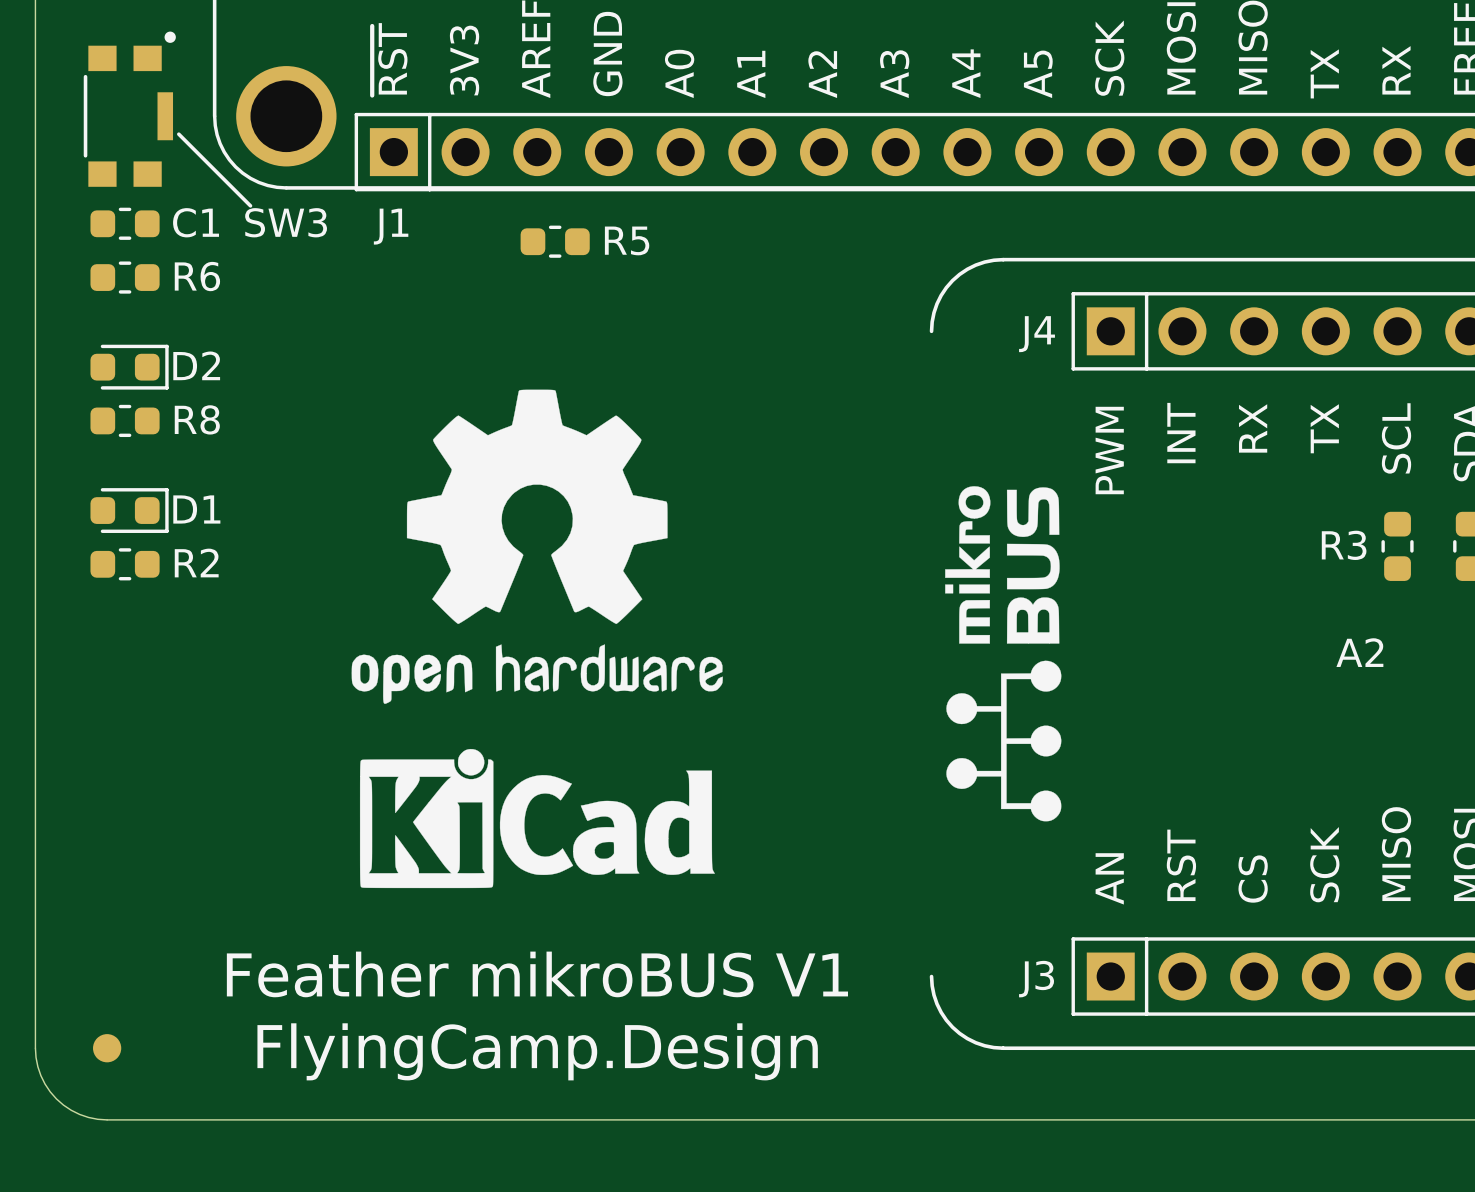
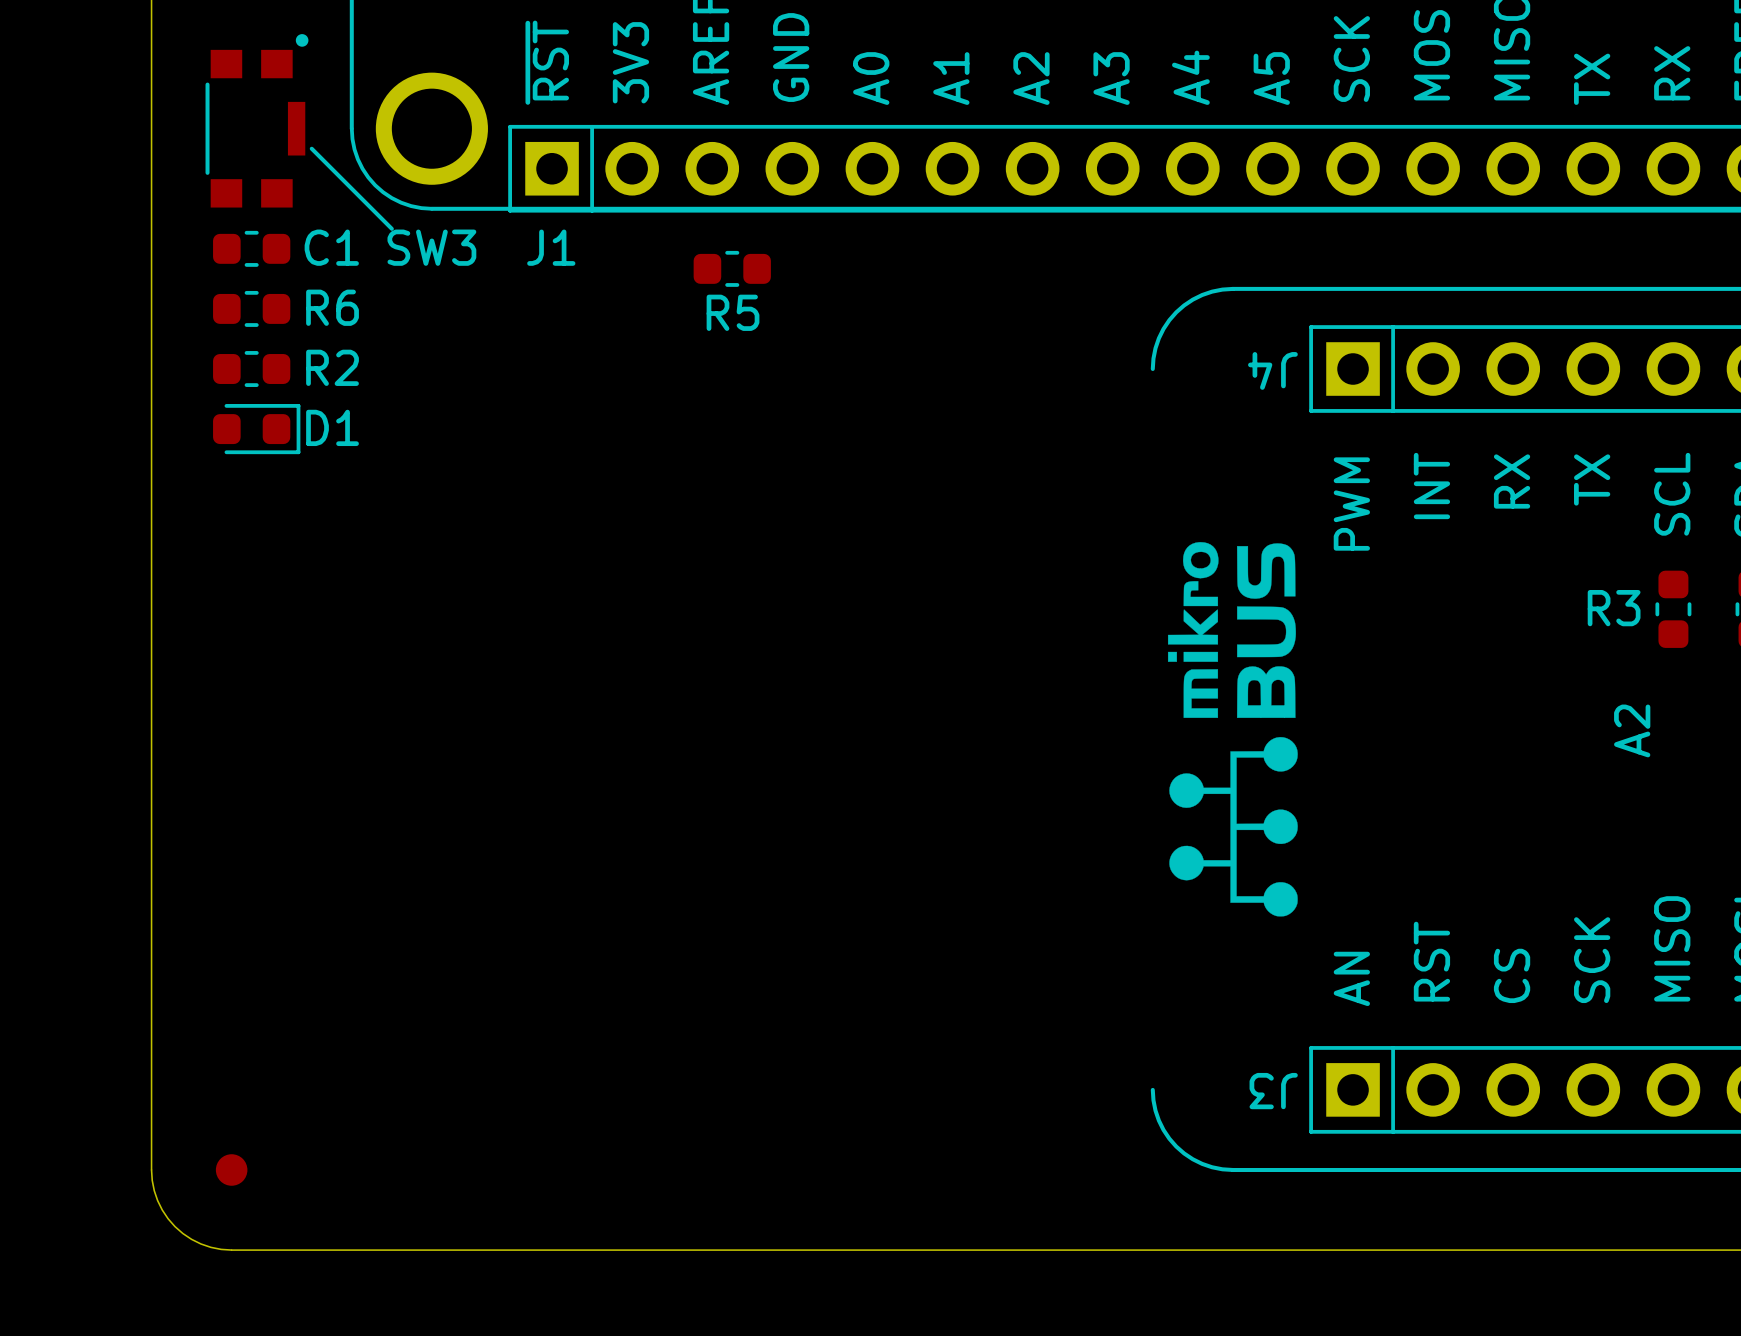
R5 name position: R5 (627, 240) -> R5 (733, 312)
J4 name rotation: 0° (1037, 334) -> 180° (1272, 370)
D2: (129, 367) -> none
drawing: [351, 389, 723, 704] -> none
R8: (125, 420) -> none
D1 position: (129, 510) -> (256, 429)
R2 position: (125, 564) -> (251, 369)
A2 name rotation: 0° (1359, 652) -> 90° counterclockwise (1632, 730)
drawing: [359, 748, 715, 889] -> none
text: Feather mikroBUS V1 (537, 974) -> none
J3 name rotation: 0° (1036, 979) -> 180° (1273, 1091)
text: FlyingCamp.Design (537, 1051) -> none

